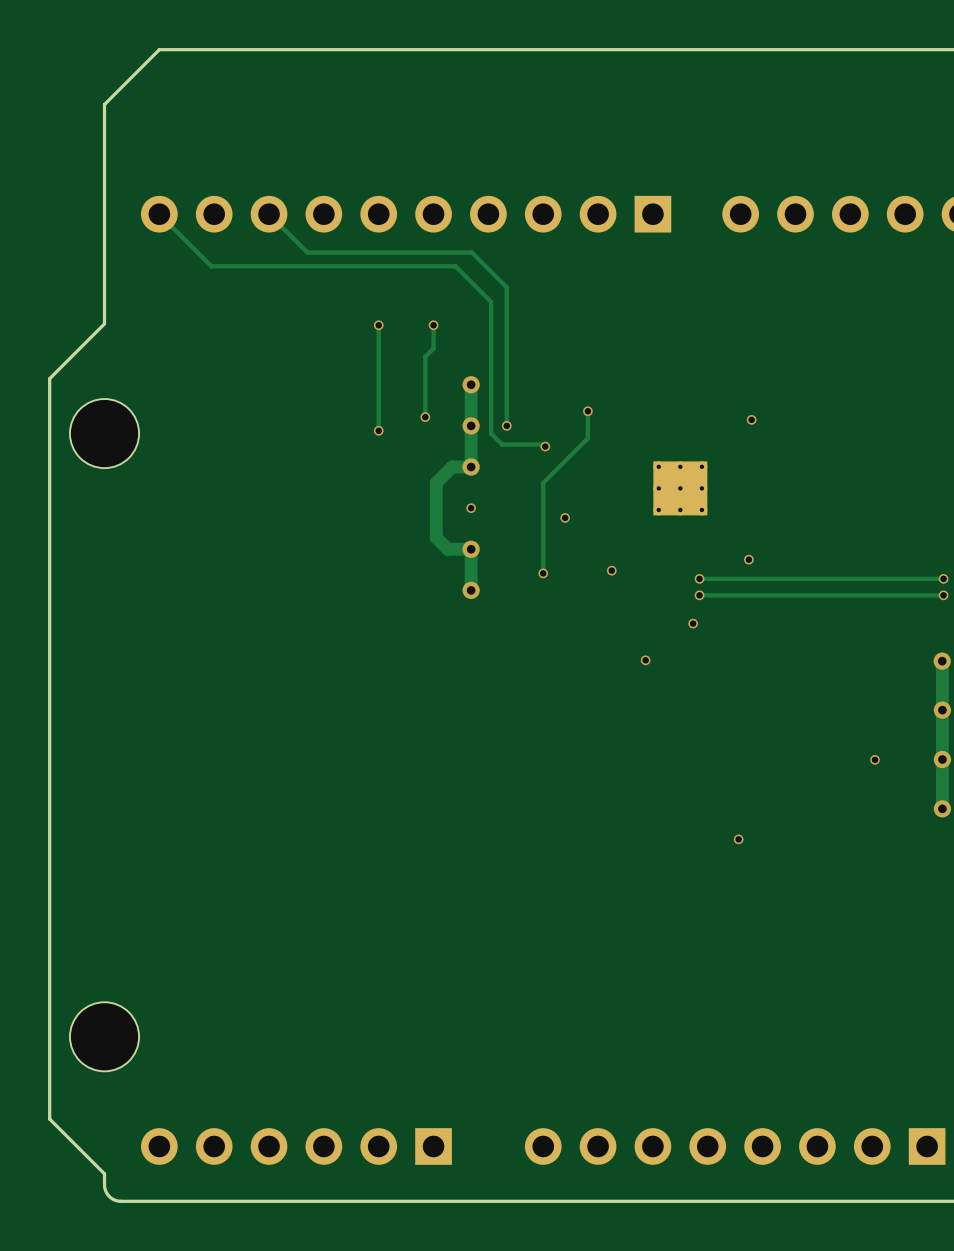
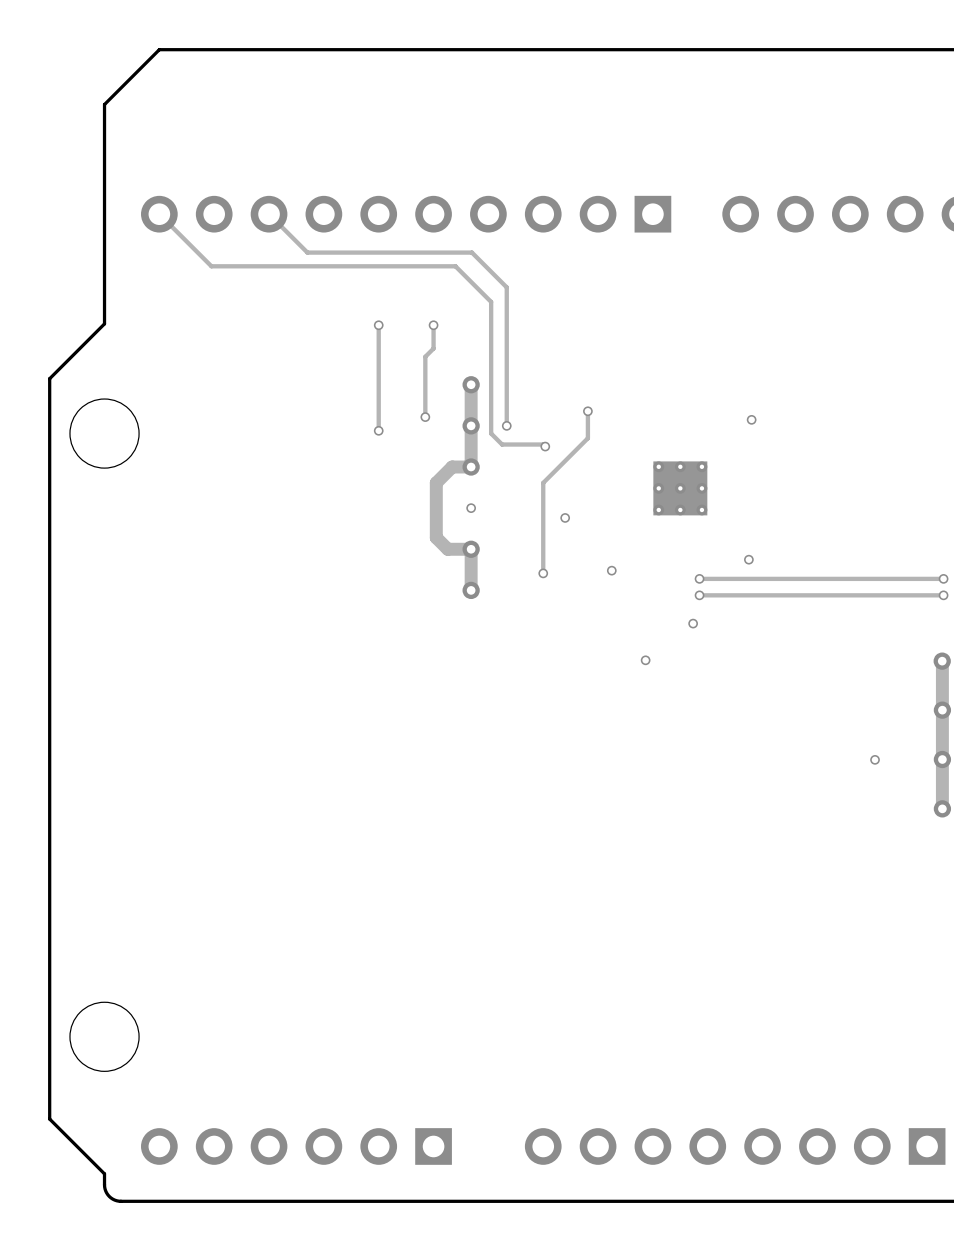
via: (738, 839) -> none

